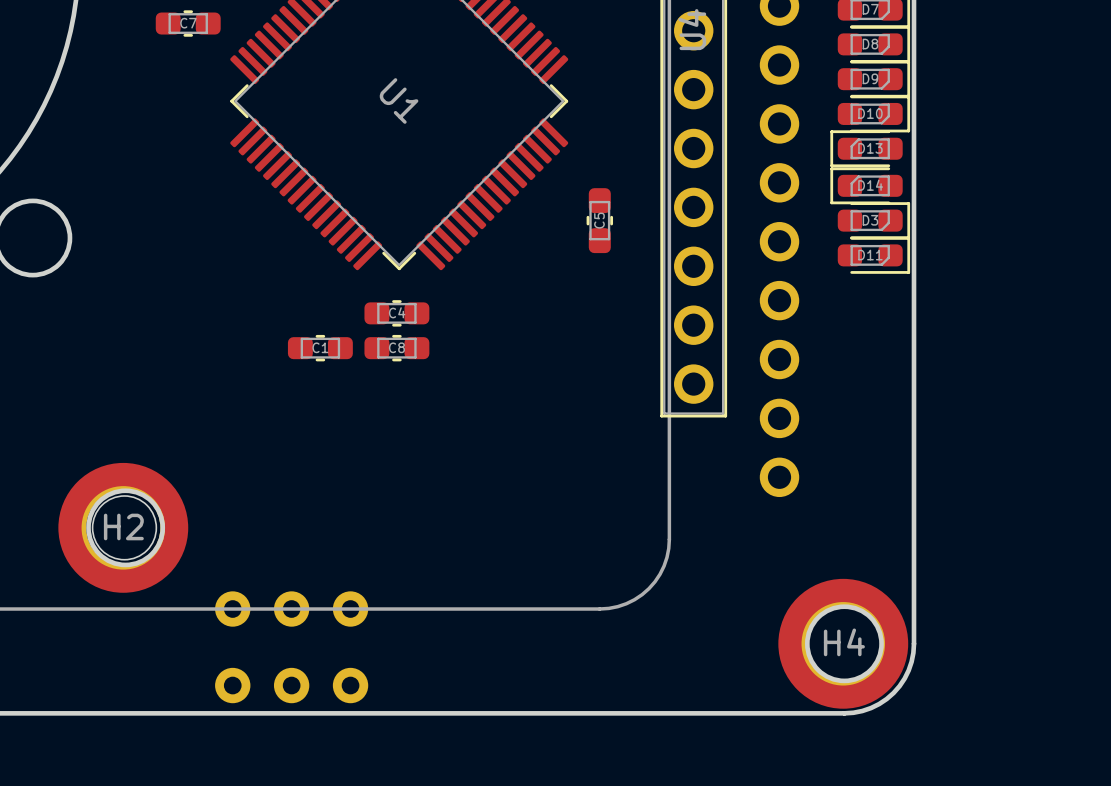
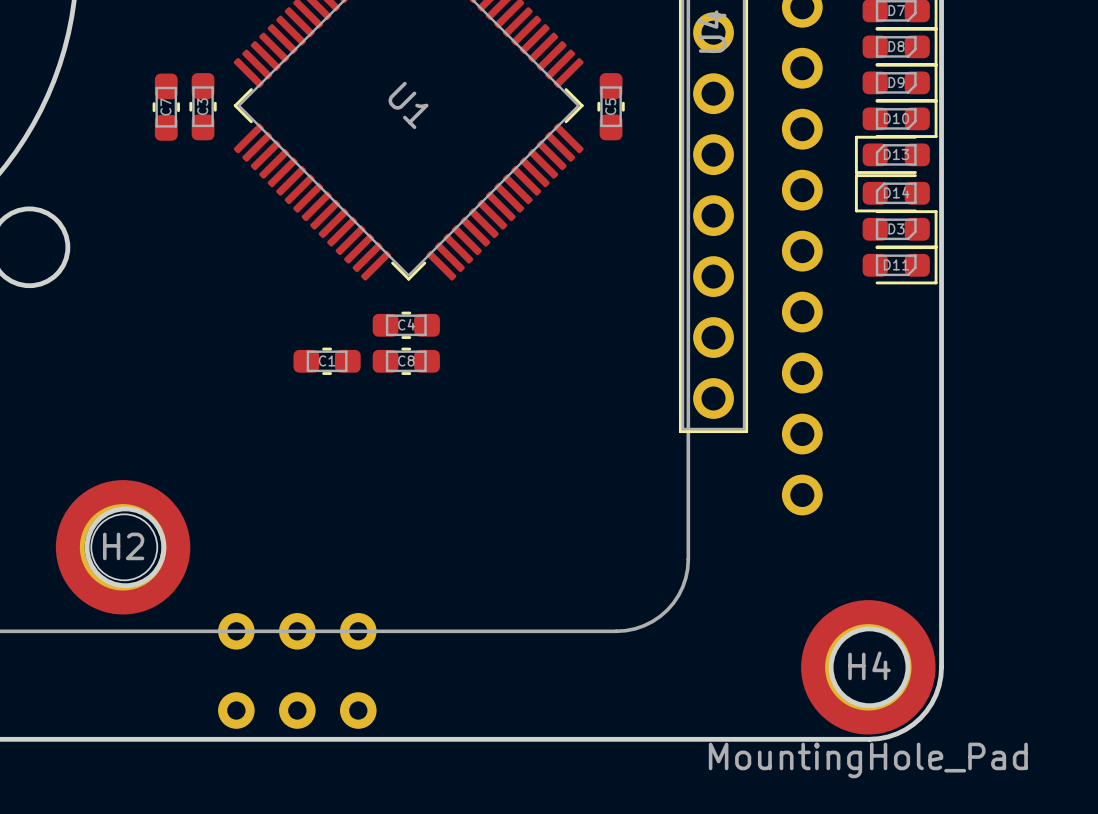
C7 rotation: 0° (188, 23) -> 90° clockwise (166, 107)
C7 position: (188, 23) -> (166, 107)
C3: none -> (203, 106)
C5 position: (599, 220) -> (611, 106)
H4 value: none -> MountingHole_Pad (868, 760)

